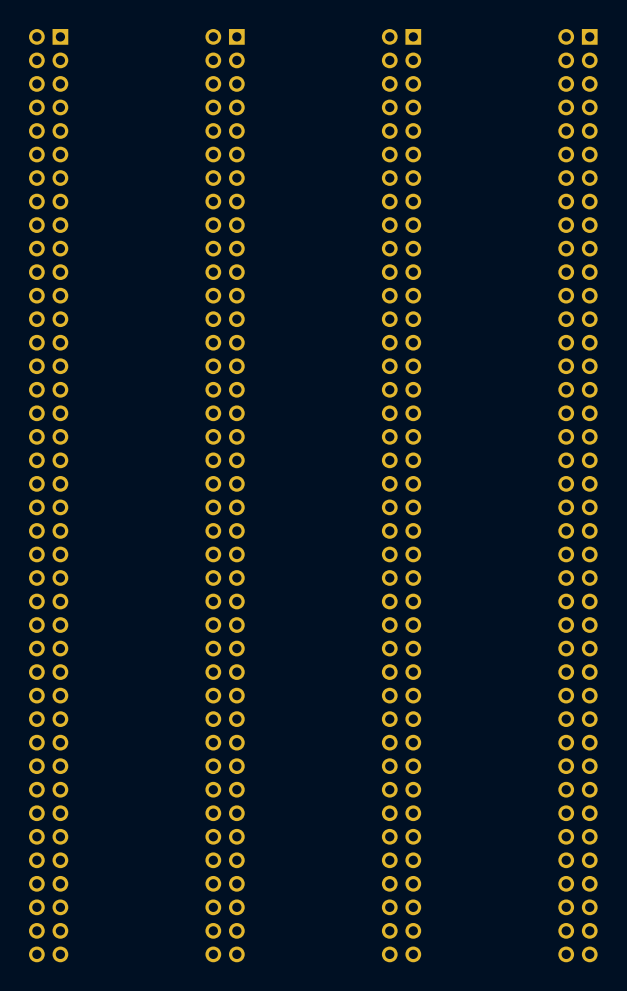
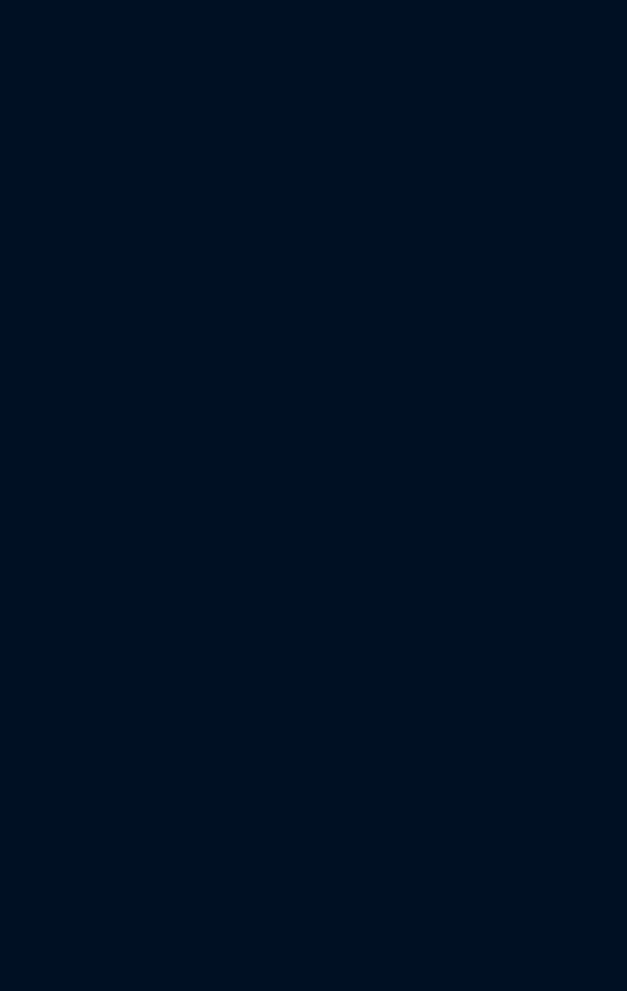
part: (48, 495) -> none
part: (225, 495) -> none
part: (401, 495) -> none
part: (577, 495) -> none

